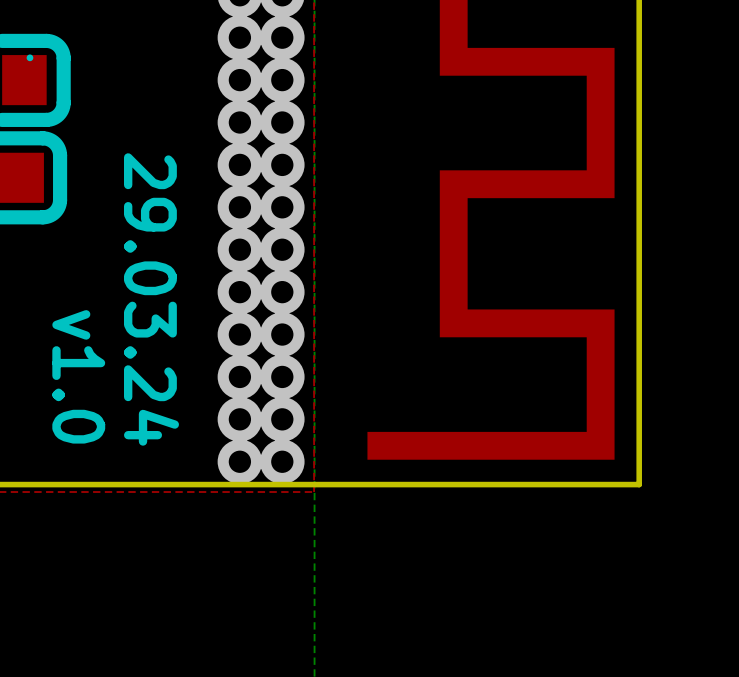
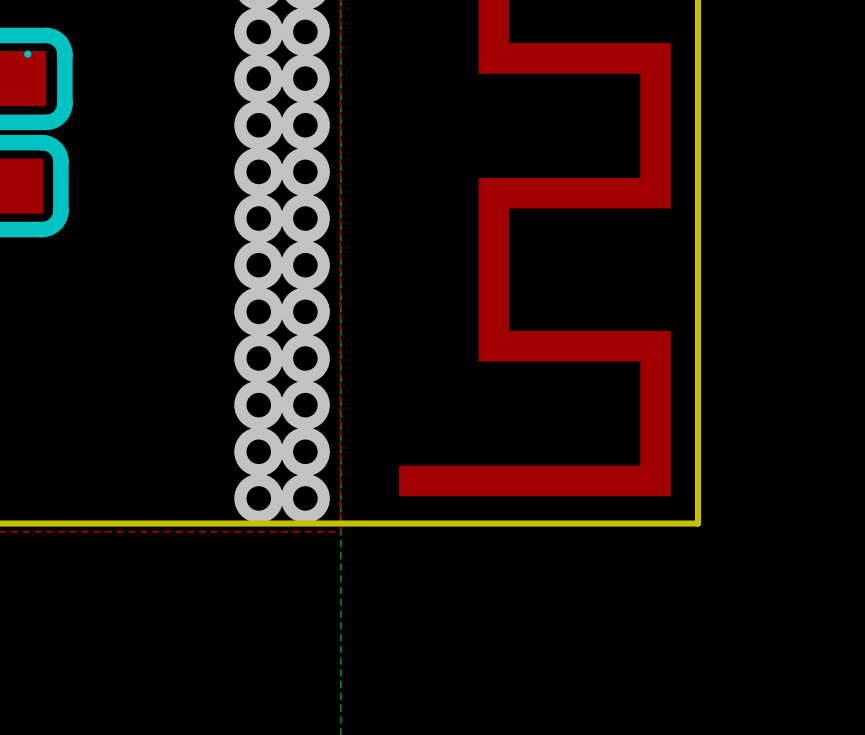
text: 29.03.24 (151, 299) -> none
text: v1.0 (78, 376) -> none

